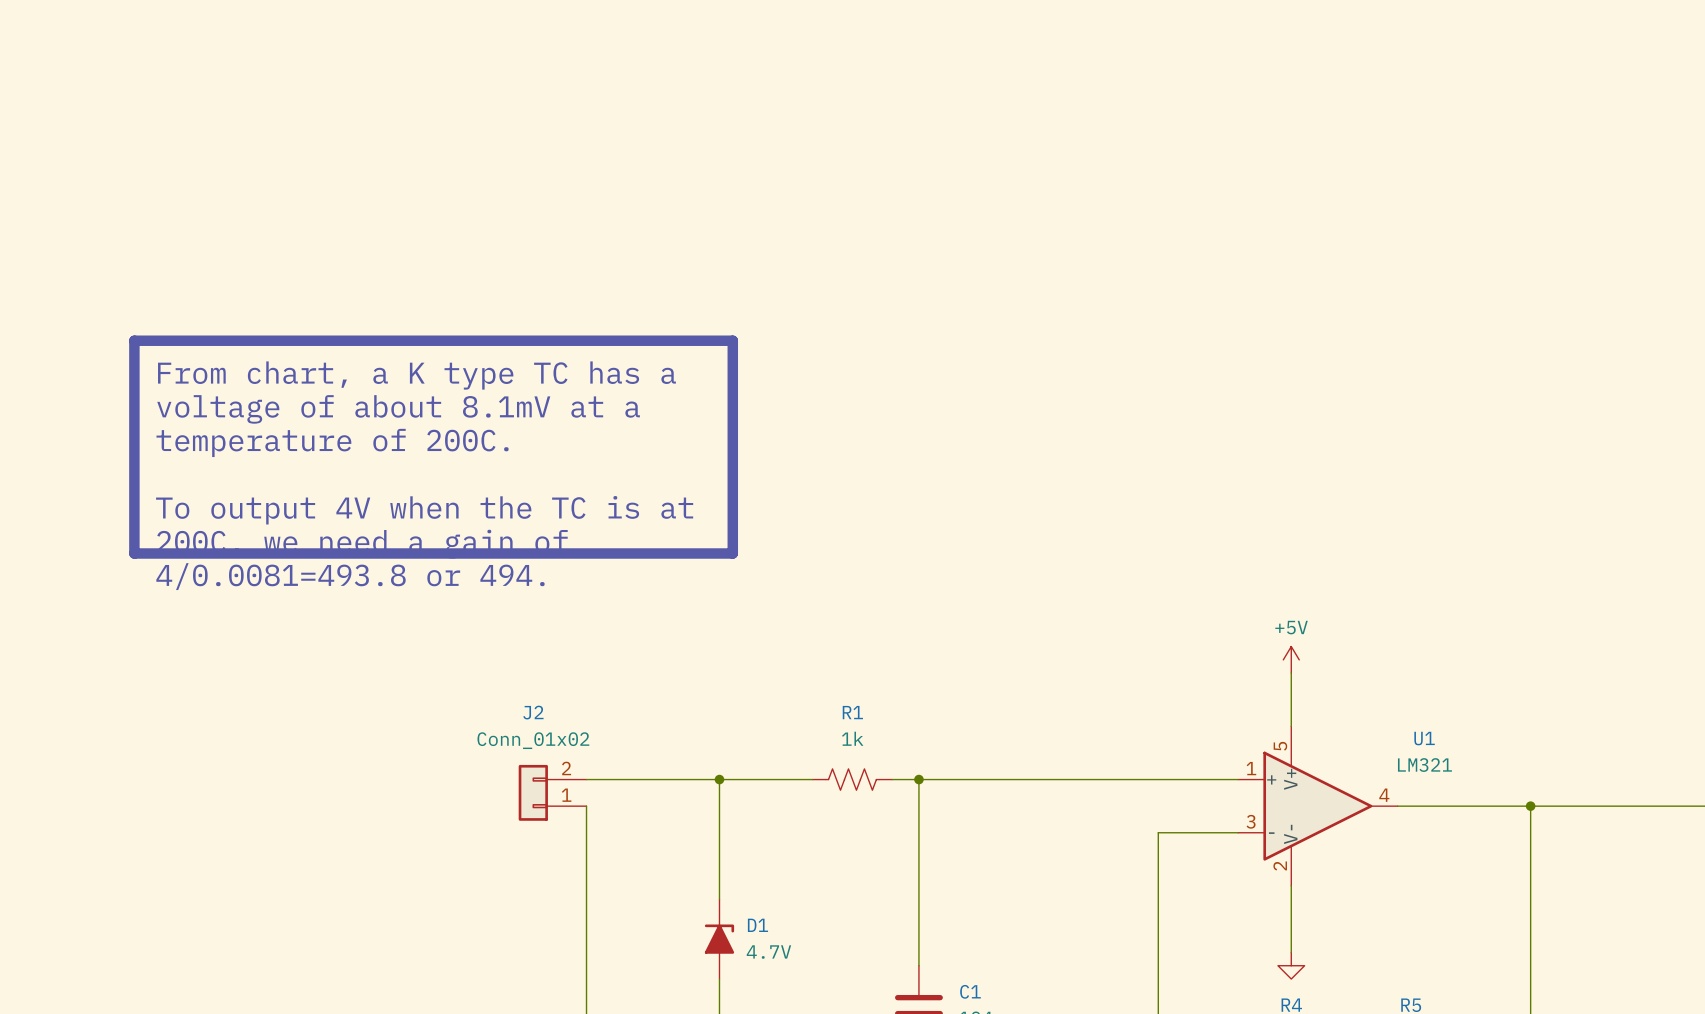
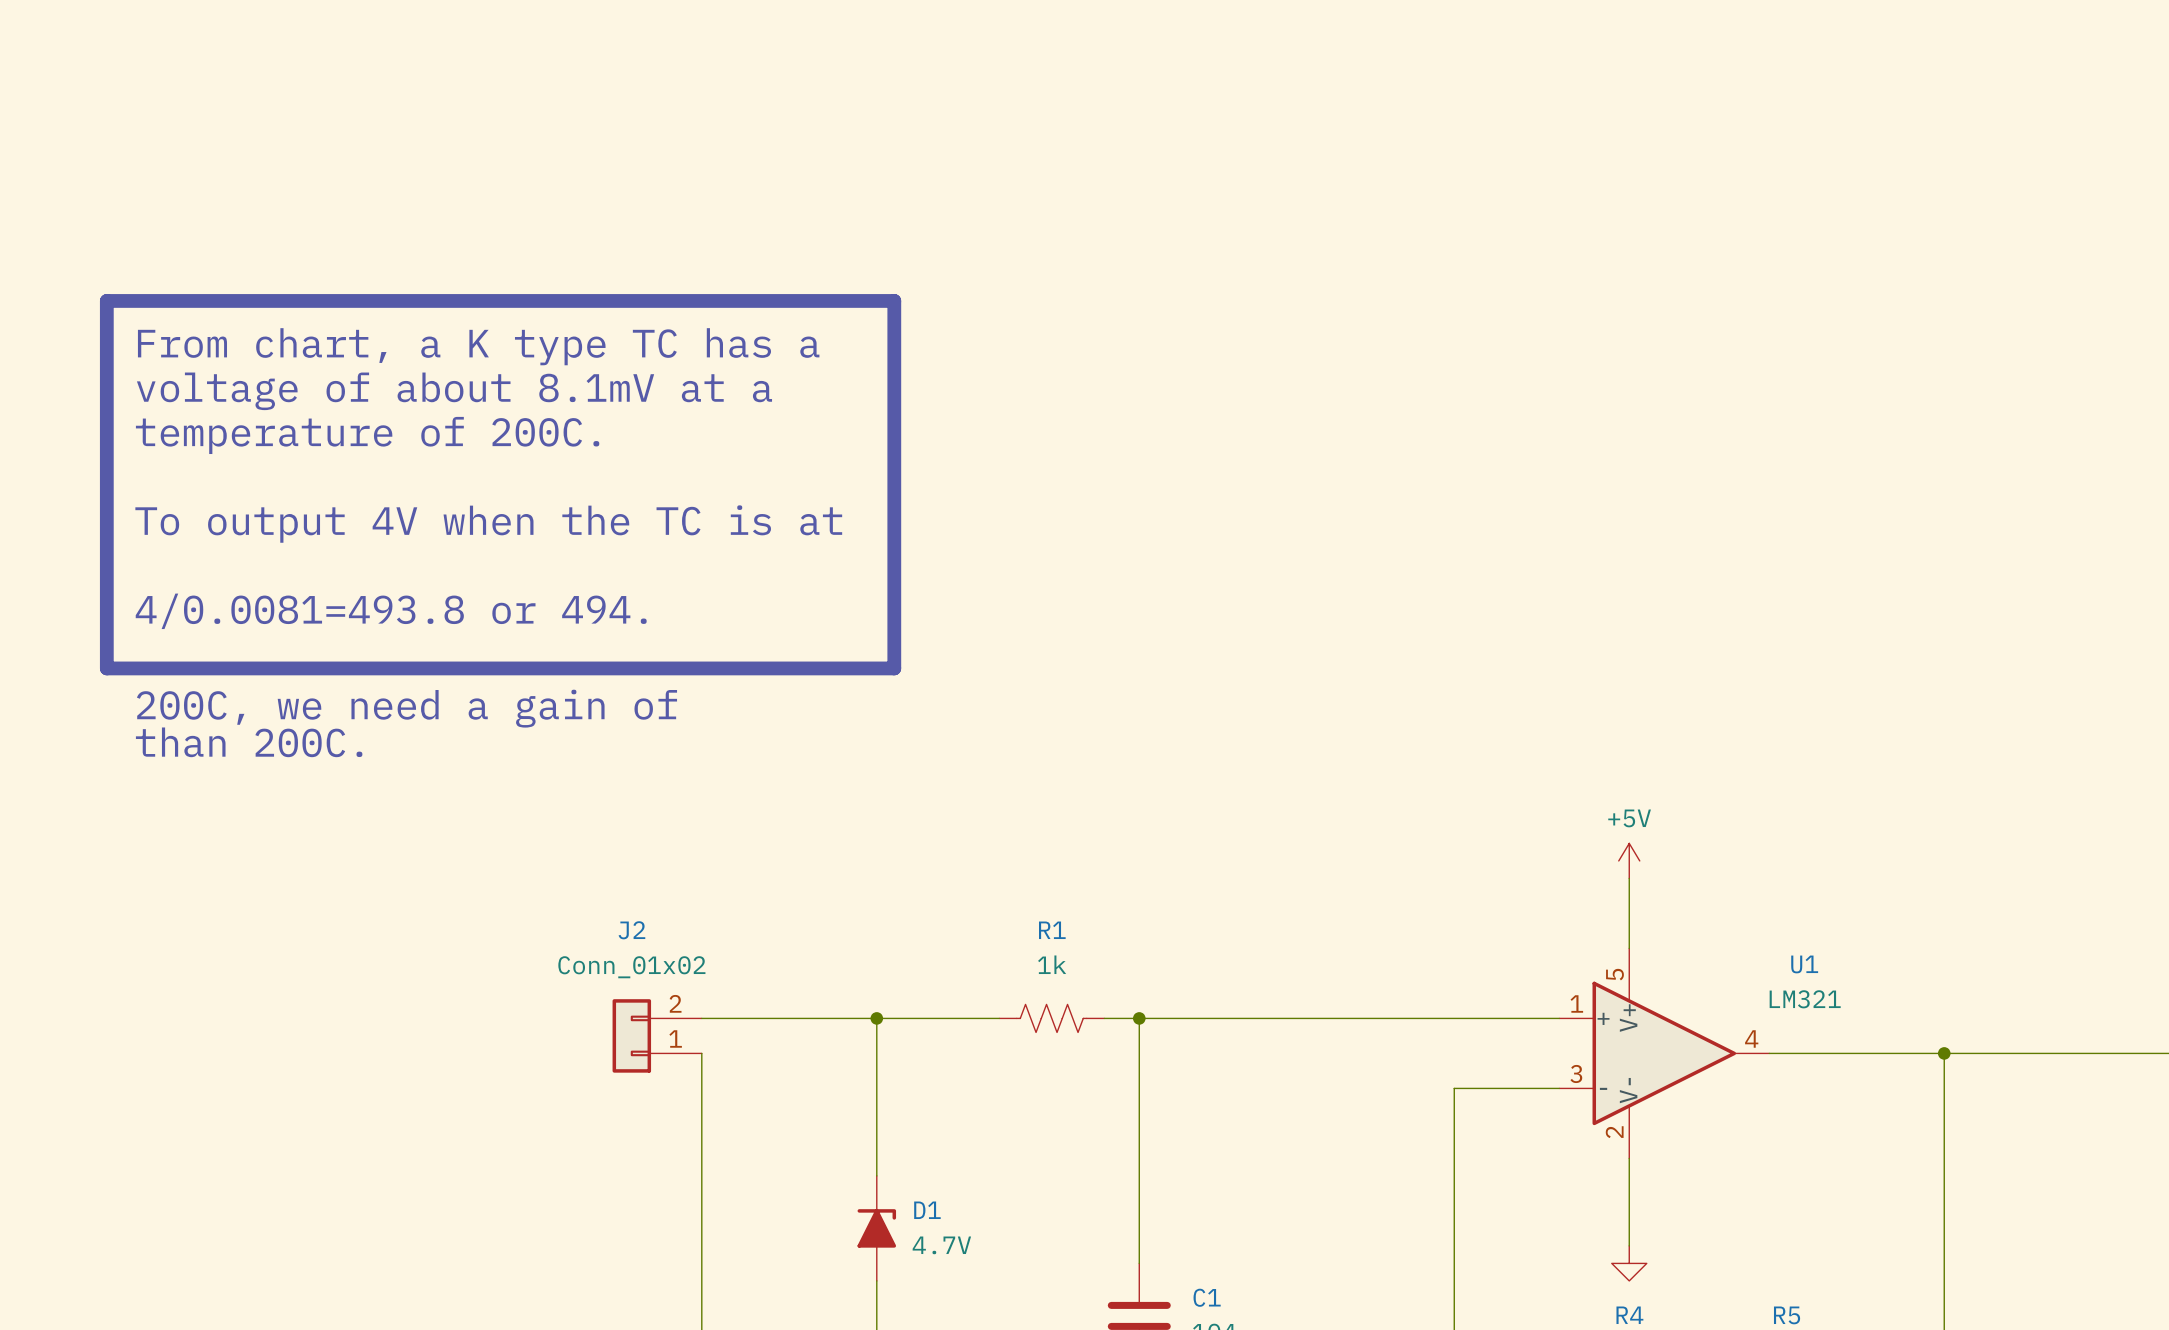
line: (134, 340) (732, 340) -> (106, 440) (106, 300) (894, 300) (894, 440)
text position: From chart, a K type TC has a (416, 375) -> From chart, a K type TC has a (478, 346)
text position: voltage of about 8.1mV at a (398, 409) -> voltage of about 8.1mV at a (454, 391)
text position: temperature of 200C. (332, 442) -> temperature of 200C. (367, 435)
text position: To output 4V when the TC is at (424, 510) -> To output 4V when the TC is at (488, 524)
line: (134, 513) (134, 553) (732, 553) (732, 513) -> (106, 668) (894, 668)
text: none -> than 200C. (249, 742)
text position: 4/0.0081=493.8 or 494. (350, 576) -> 4/0.0081=493.8 or 494. (391, 611)

